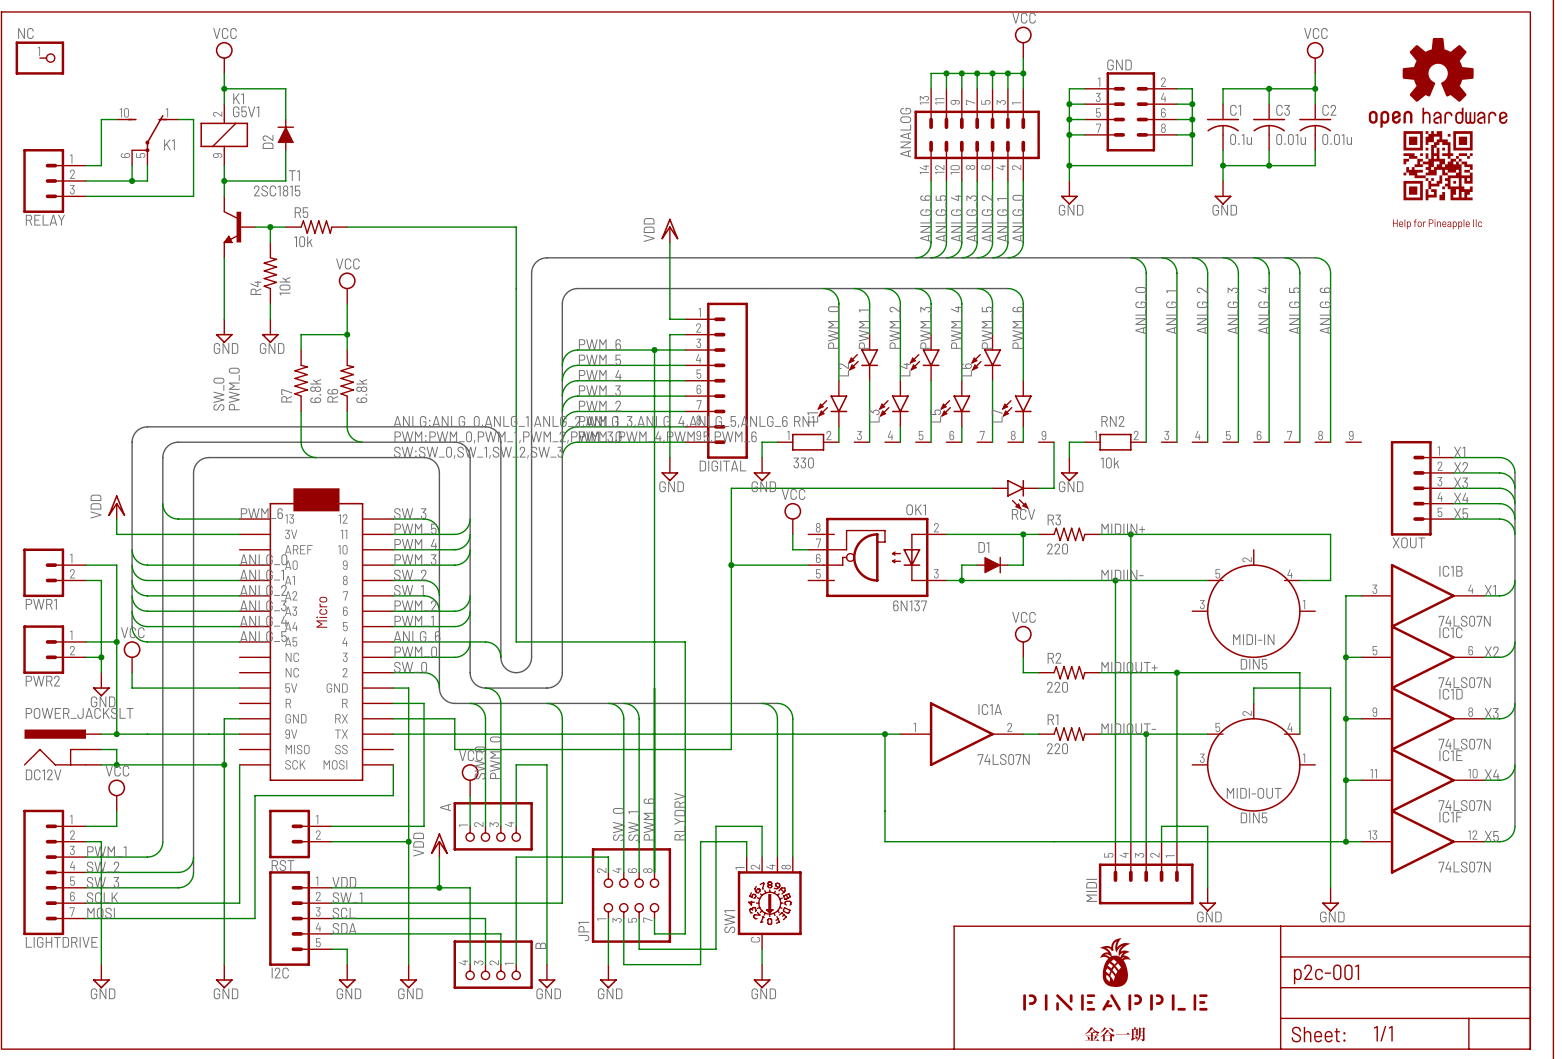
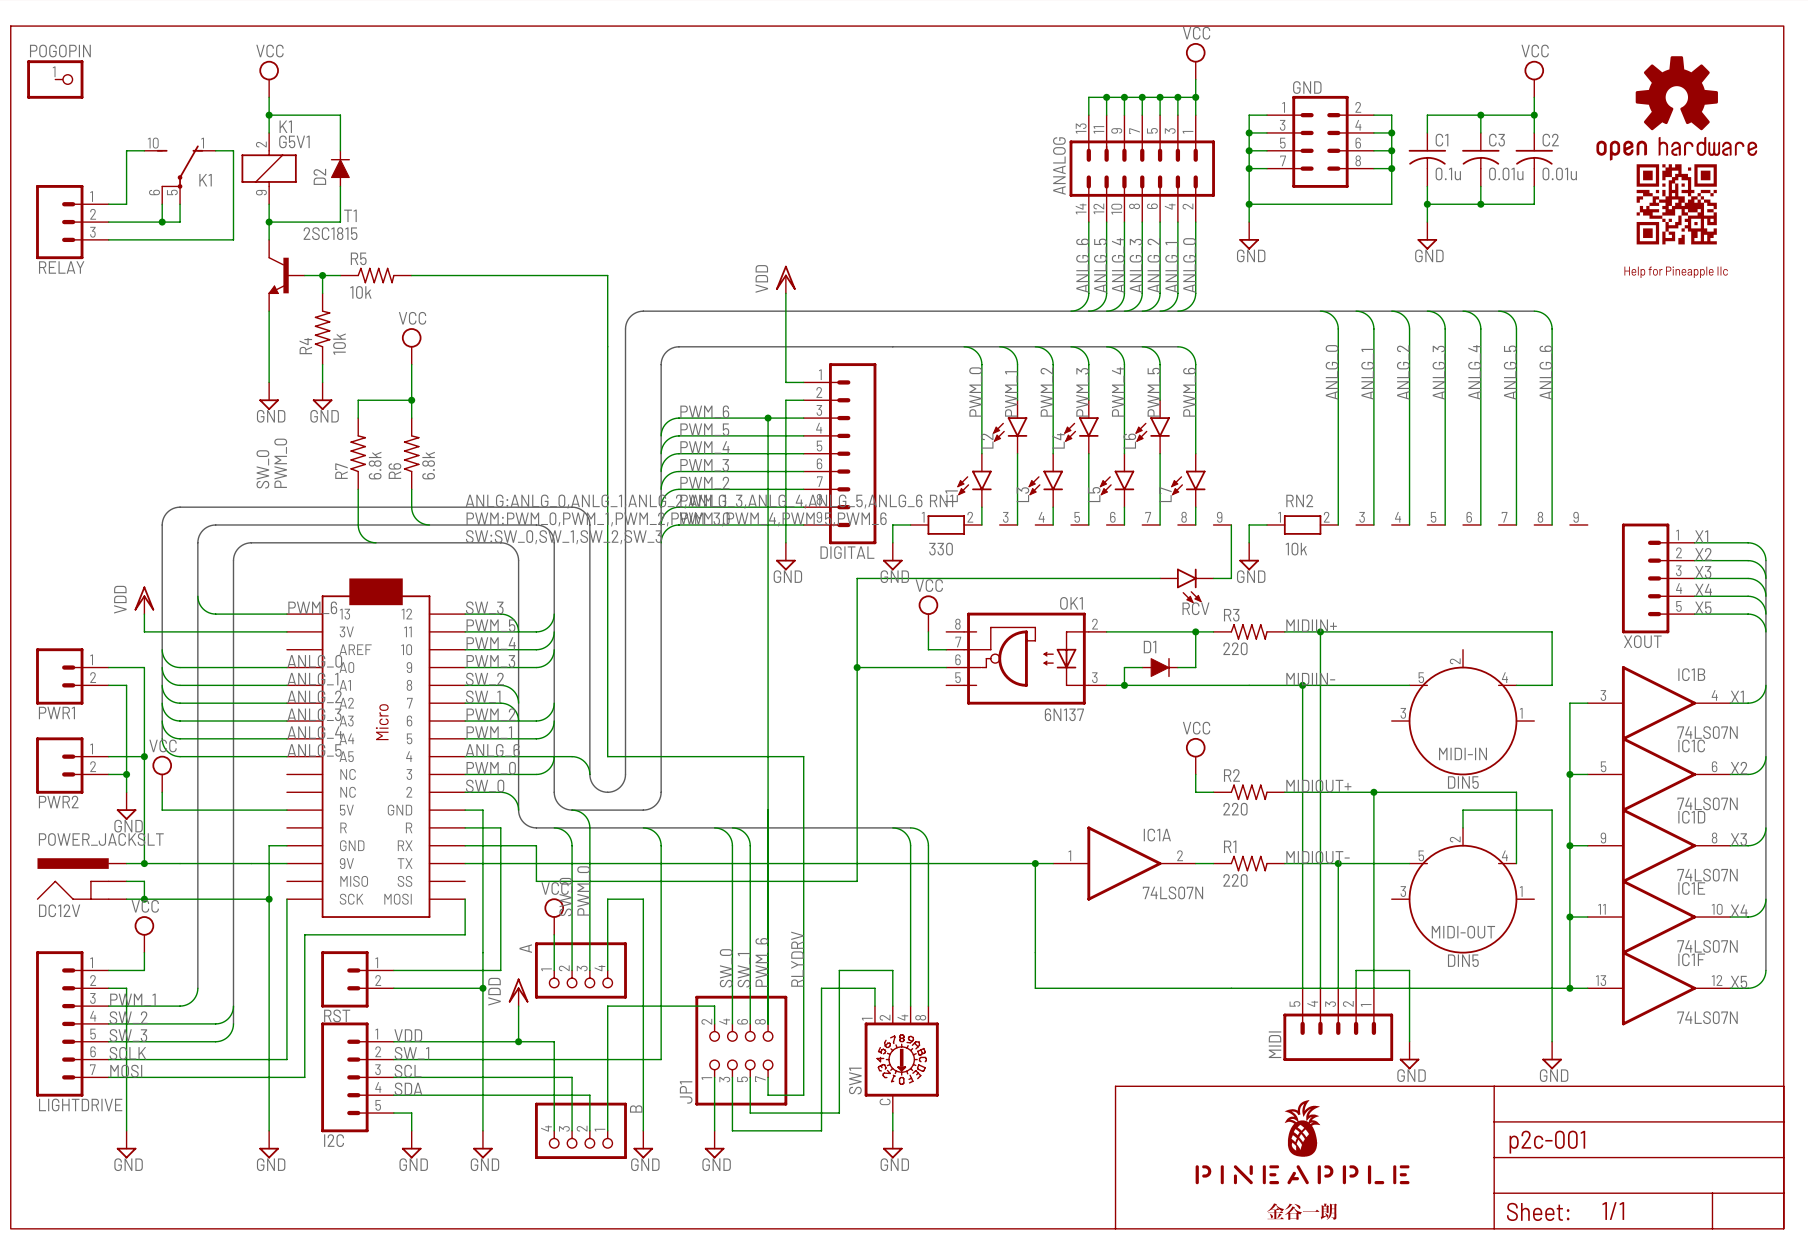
NC name: NC (25, 33) -> POGOPIN (60, 51)

